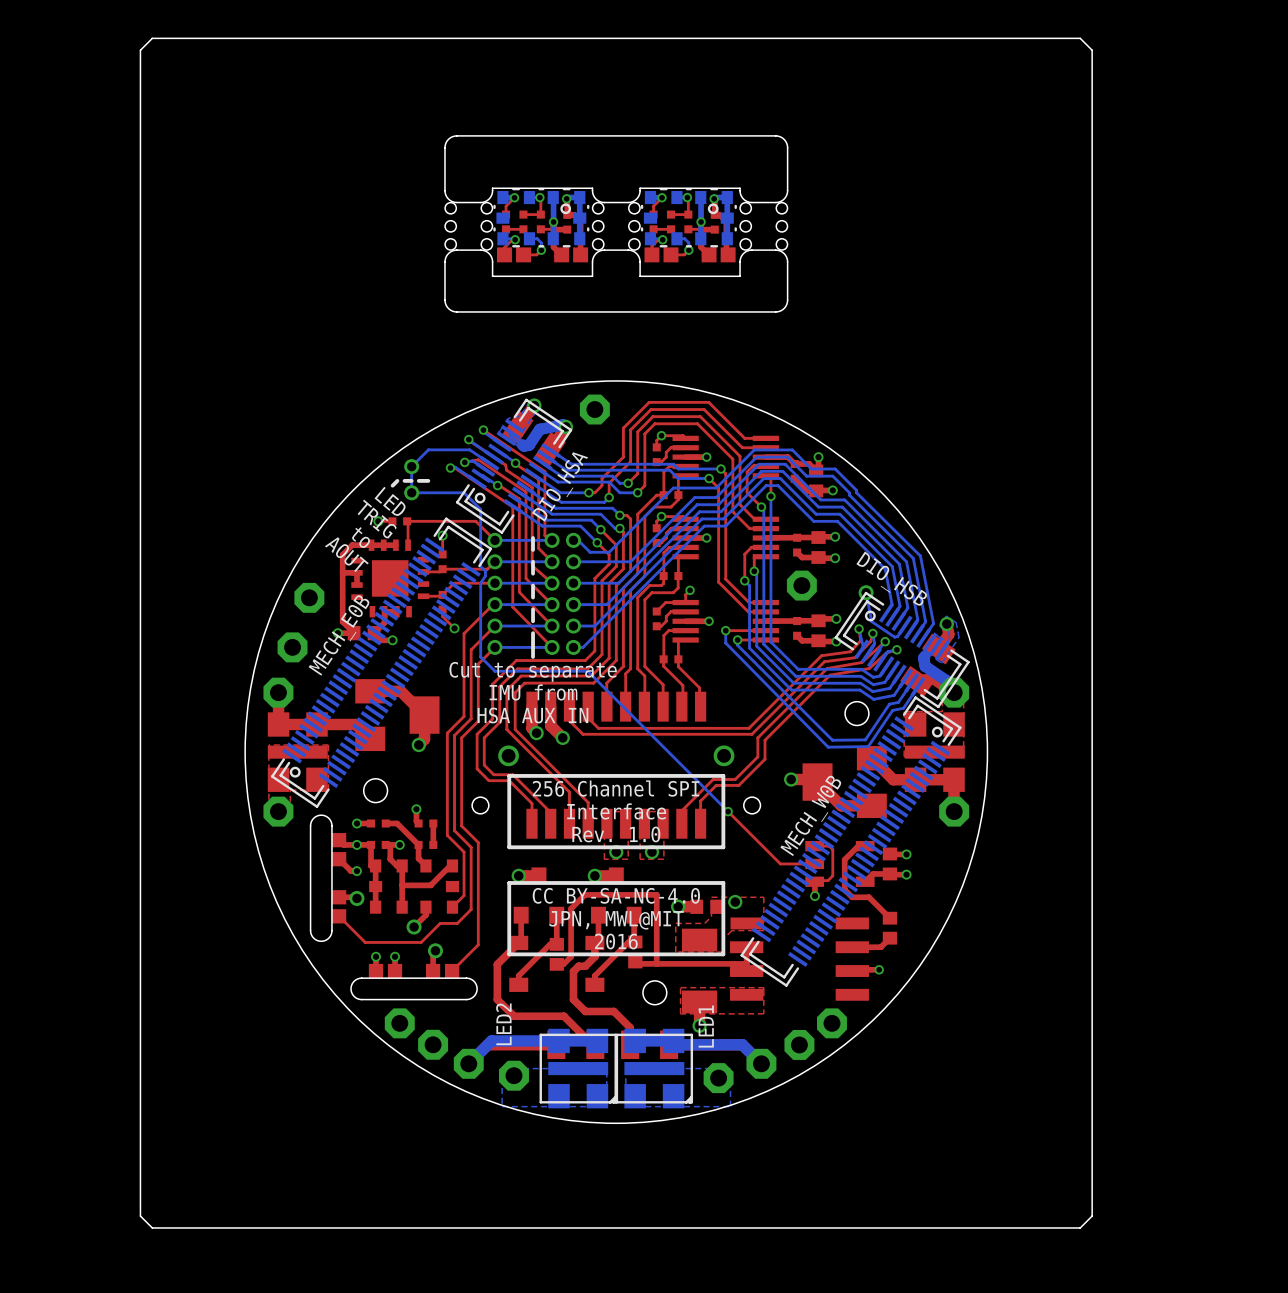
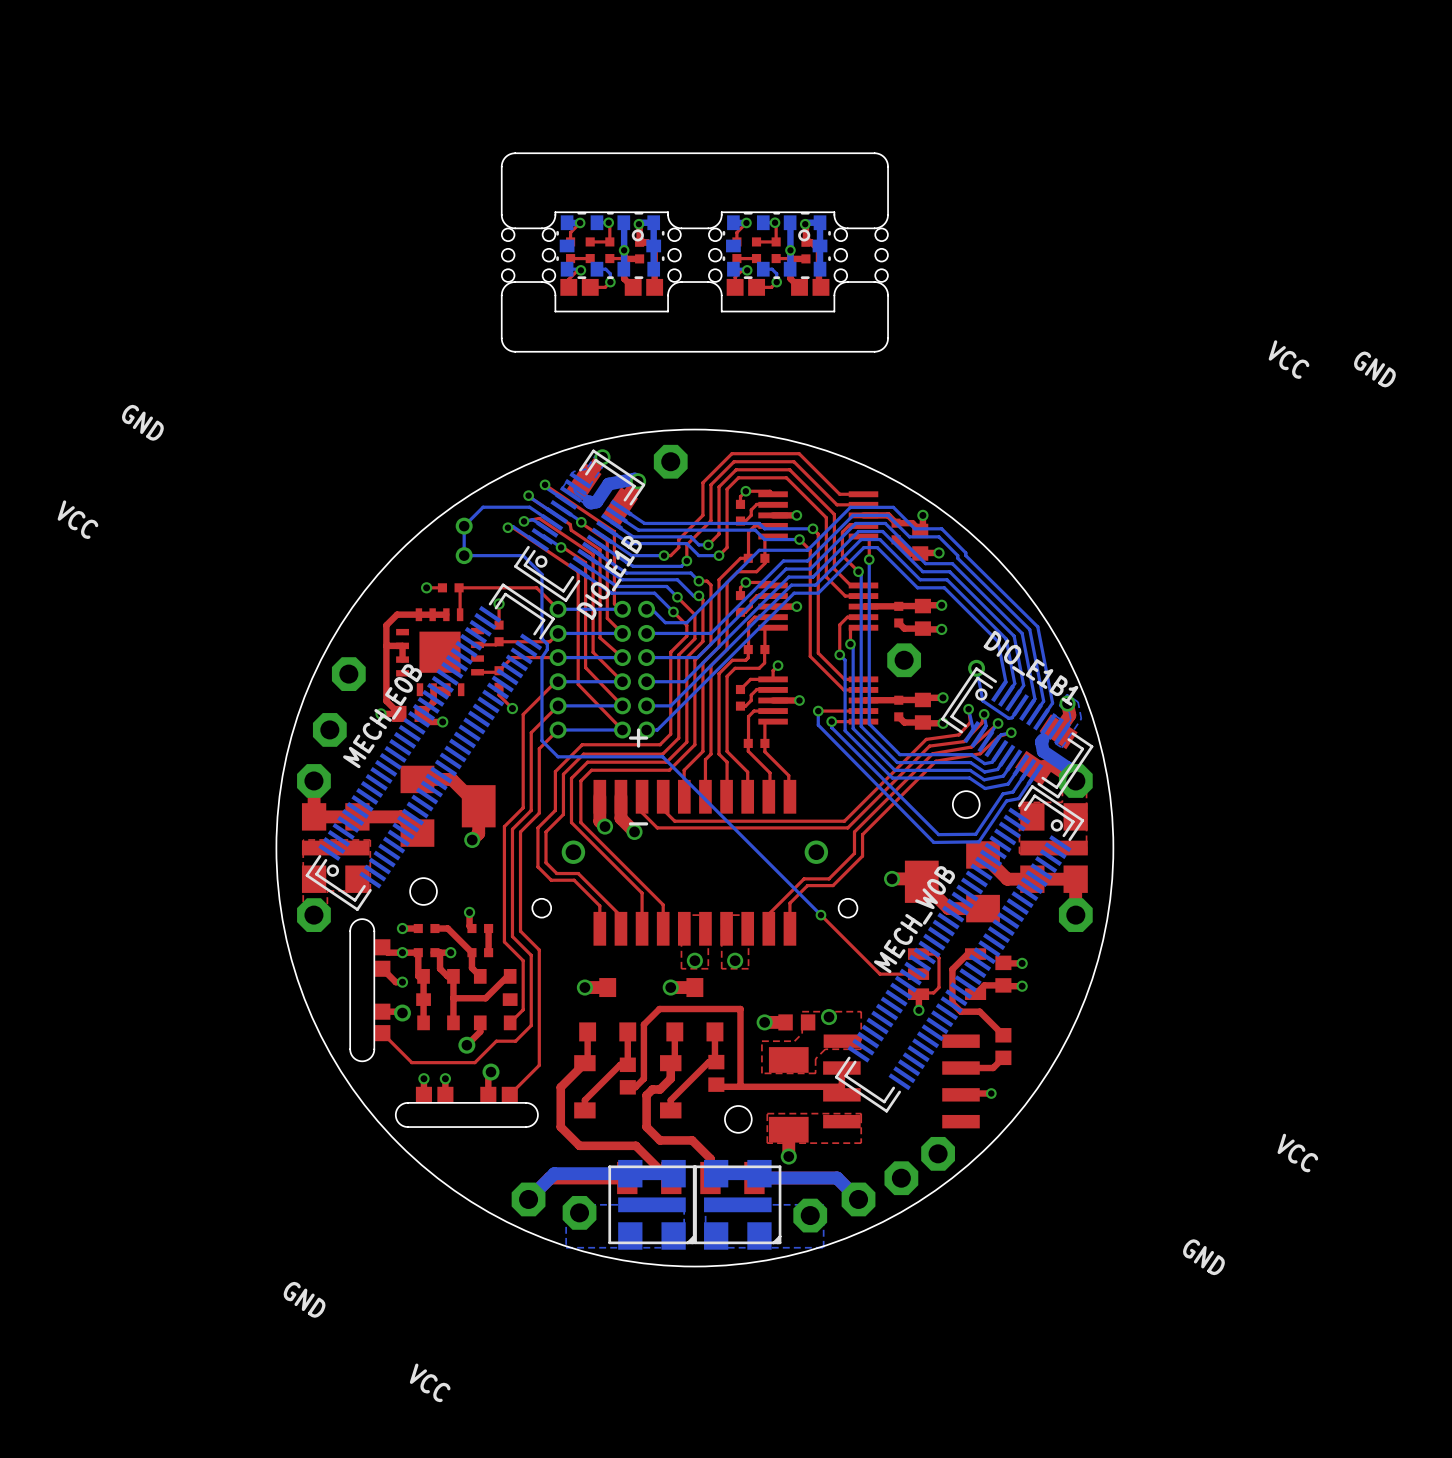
board edge: (1080, 38) (1092, 50) (1092, 1216) (1080, 1227) (152, 1227) (140, 1216) (140, 50) (152, 38) (1080, 38) -> none
text: none -> VCC (1289, 359)
text: none -> GND (1374, 369)
text: none -> GND (142, 422)
text: none -> VCC (77, 519)
line: (397, 480) (392, 485) -> none
line: (411, 480) (404, 480) -> none
line: (428, 480) (418, 480) -> none
DIO_HSA name: DIO_HSA (560, 486) -> DIO_E1B (609, 577)
text: LED (390, 501) -> none
text: TRIG (377, 519) -> none
text: to (361, 537) -> none
line: (533, 538) (533, 549) -> none
text: AOUT (346, 554) -> none
line: (533, 561) (533, 573) -> none
DIO_HSB name: DIO_HSB (891, 578) -> DIO_E1B1 (1031, 668)
line: (533, 585) (533, 597) -> none
line: (533, 609) (533, 621) -> none
line: (533, 633) (533, 656) -> none
line: none -> (638, 730) (638, 746)
line: none -> (646, 738) (630, 738)
text: Cut to separate (533, 671) -> none
text: IMU from (533, 692) -> none
text: HSA AUX IN (533, 715) -> none
line: none -> (646, 823) (630, 823)
line: (723, 775) (723, 847) (509, 847) (509, 775) (723, 775) -> none
text: 256 Channel SPI (616, 788) -> none
text: Interface (616, 811) -> none
text: Rev. 1.0 (616, 834) -> none
line: (723, 882) (723, 954) (509, 954) (509, 882) (723, 882) -> none
text: CC BY-SA-NC-4.0 (616, 895) -> none
text: JPN, MWL@MIT (616, 920) -> none
text: 2016 (616, 941) -> none
text: none -> VCC (1297, 1153)
part: (399, 1023) -> none
LED2 name: LED2 (503, 1024) -> none
LED1 name: LED1 (706, 1026) -> none
part: (433, 1044) -> none
text: none -> GND (1203, 1257)
text: none -> GND (304, 1299)
text: none -> VCC (430, 1382)

